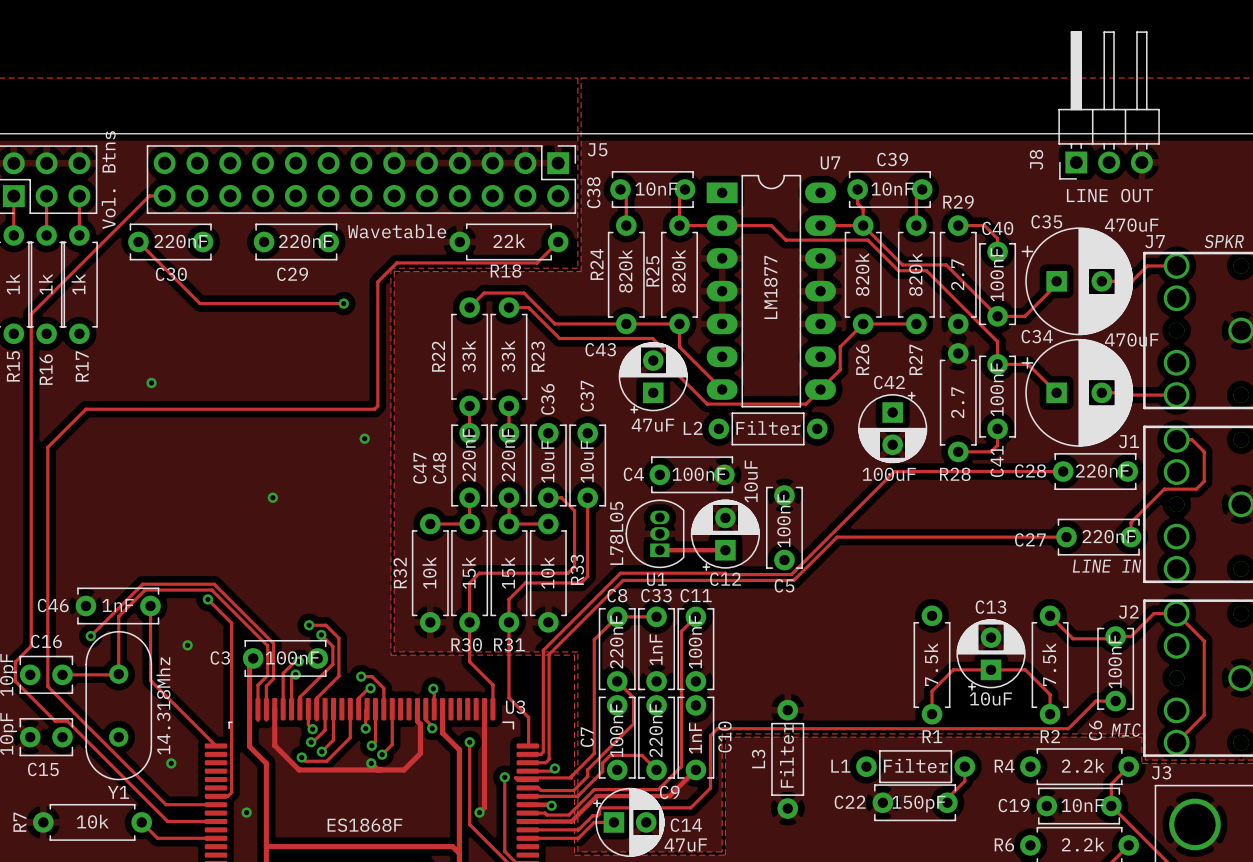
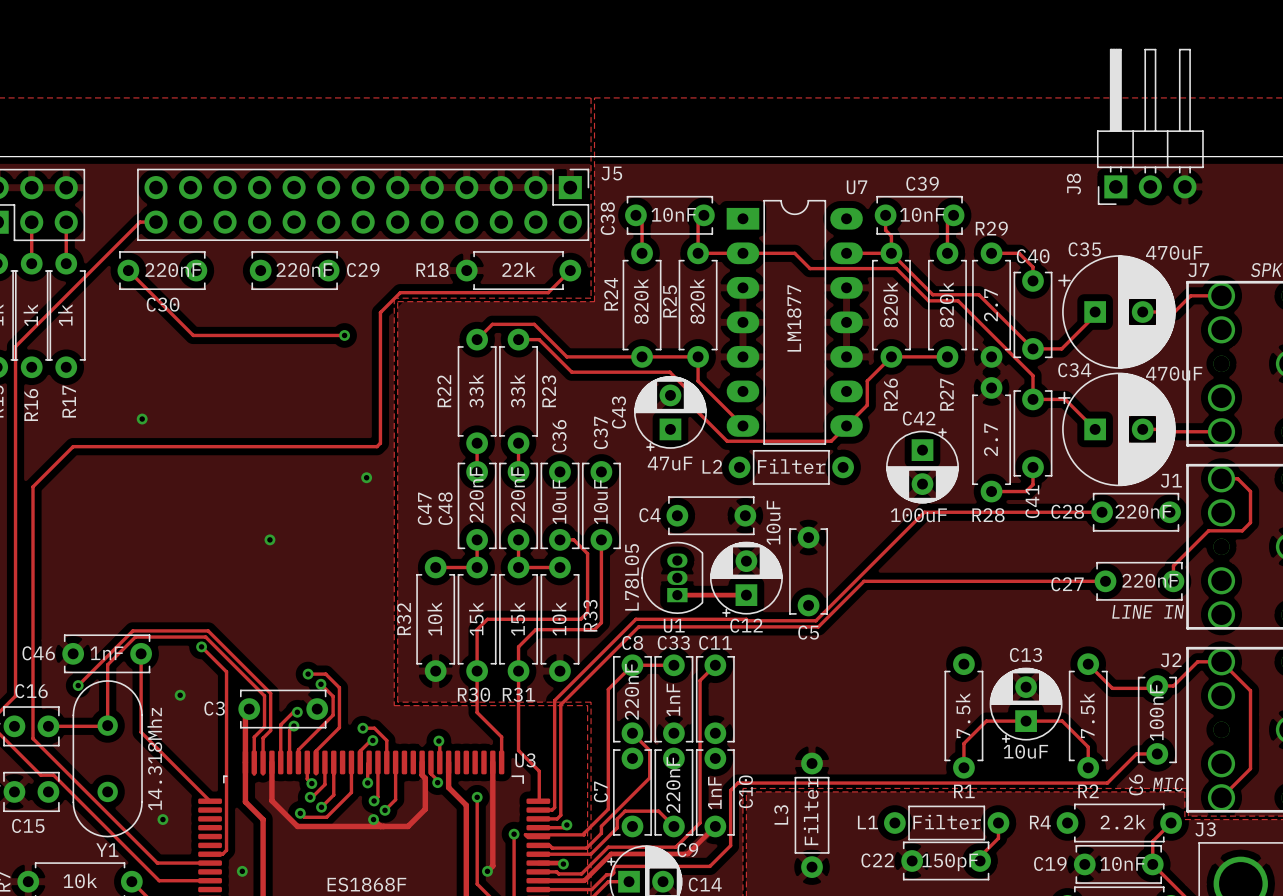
part value: Vol. Btns (108, 180) -> none
J8 value: LINE OUT (1109, 195) -> none
J5 value: Wavetable (397, 231) -> none
R18 name position: R18 (506, 271) -> R18 (432, 270)
C29 name position: C29 (292, 274) -> C29 (363, 270)
C40 value: 100nF (997, 274) -> none
C43 name rotation: 0° (600, 349) -> 90° counterclockwise (618, 412)
C41 value: 100nF (997, 389) -> none
C4 value: 100nF (699, 474) -> none
C5 value: 100nF (783, 520) -> none
C11 value: 100nF (695, 642) -> none
C3 value: 100nF (292, 657) -> none
C7 value: 100nF (616, 730) -> none

